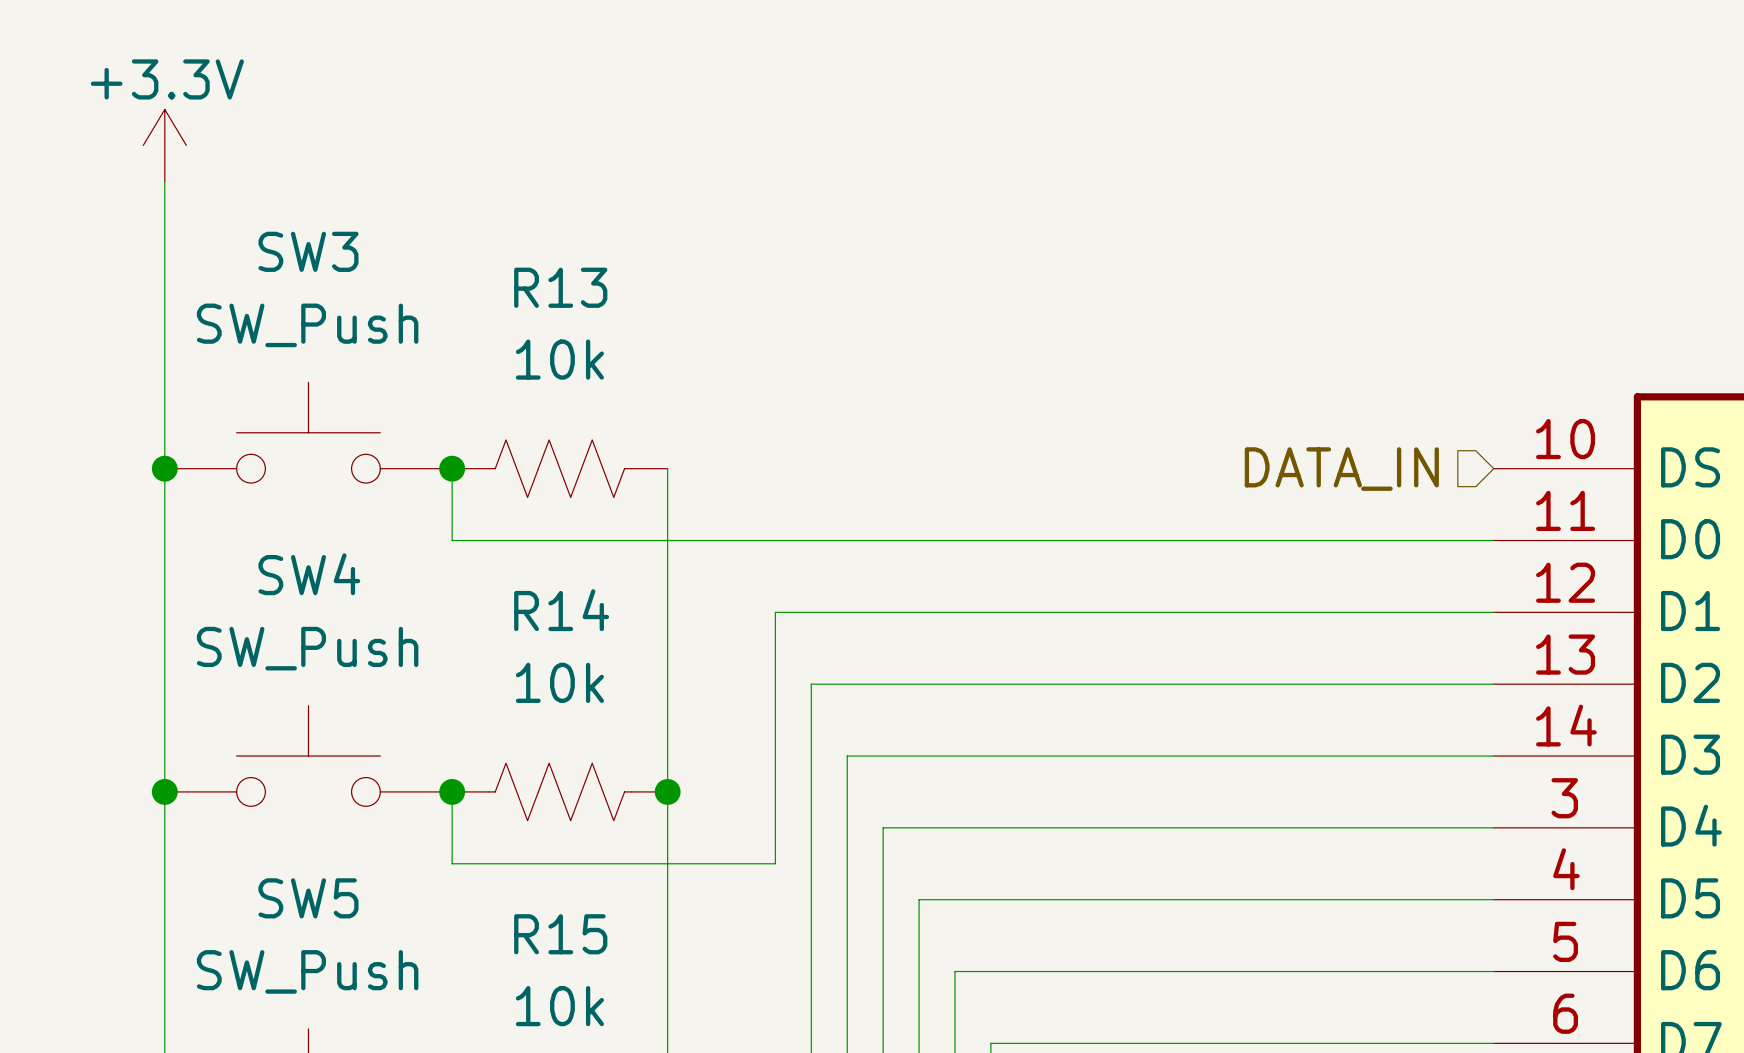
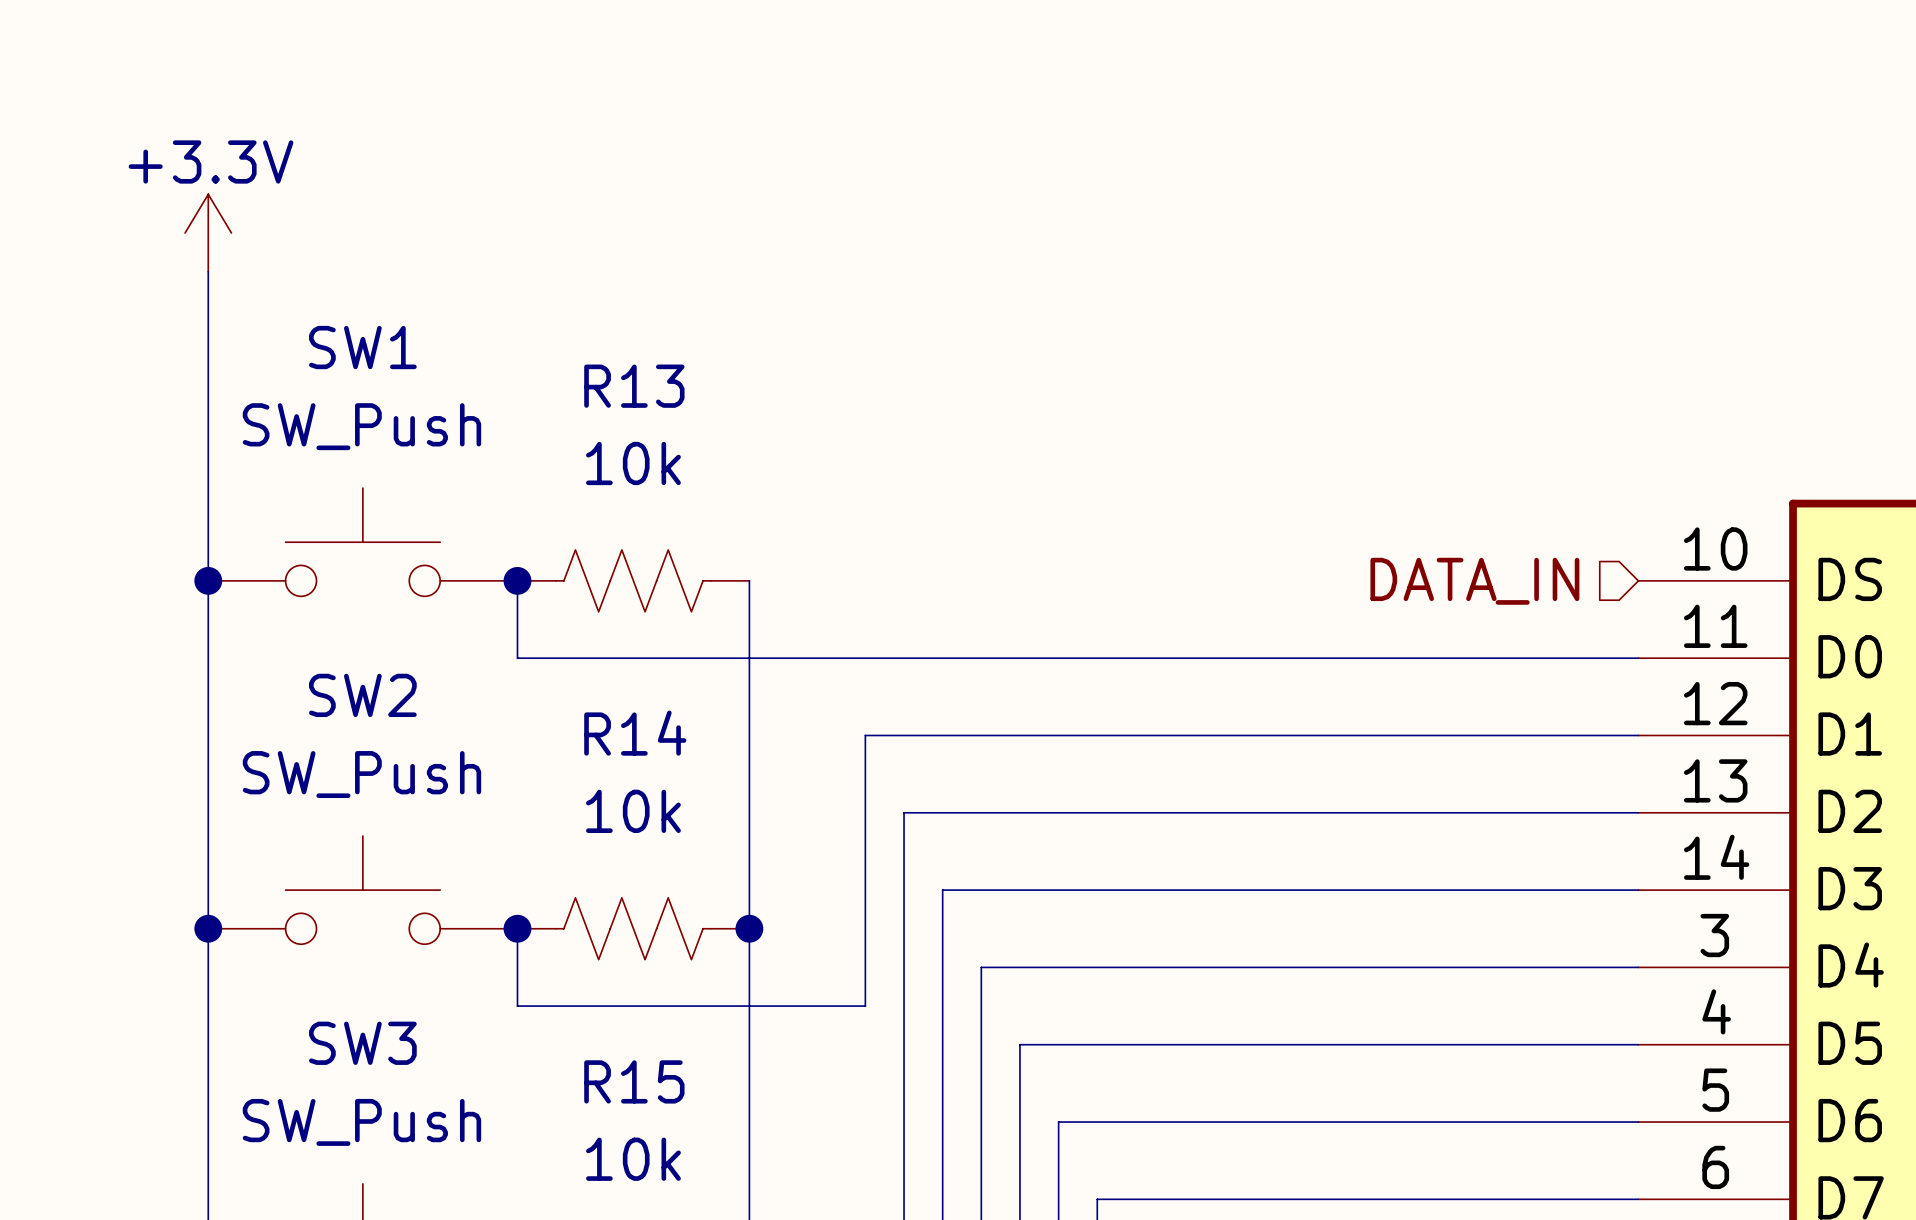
SW3 name: SW3 (308, 251) -> SW1 (362, 347)
SW4 name: SW4 (309, 574) -> SW2 (362, 695)
SW5 name: SW5 (308, 898) -> SW3 (362, 1043)

